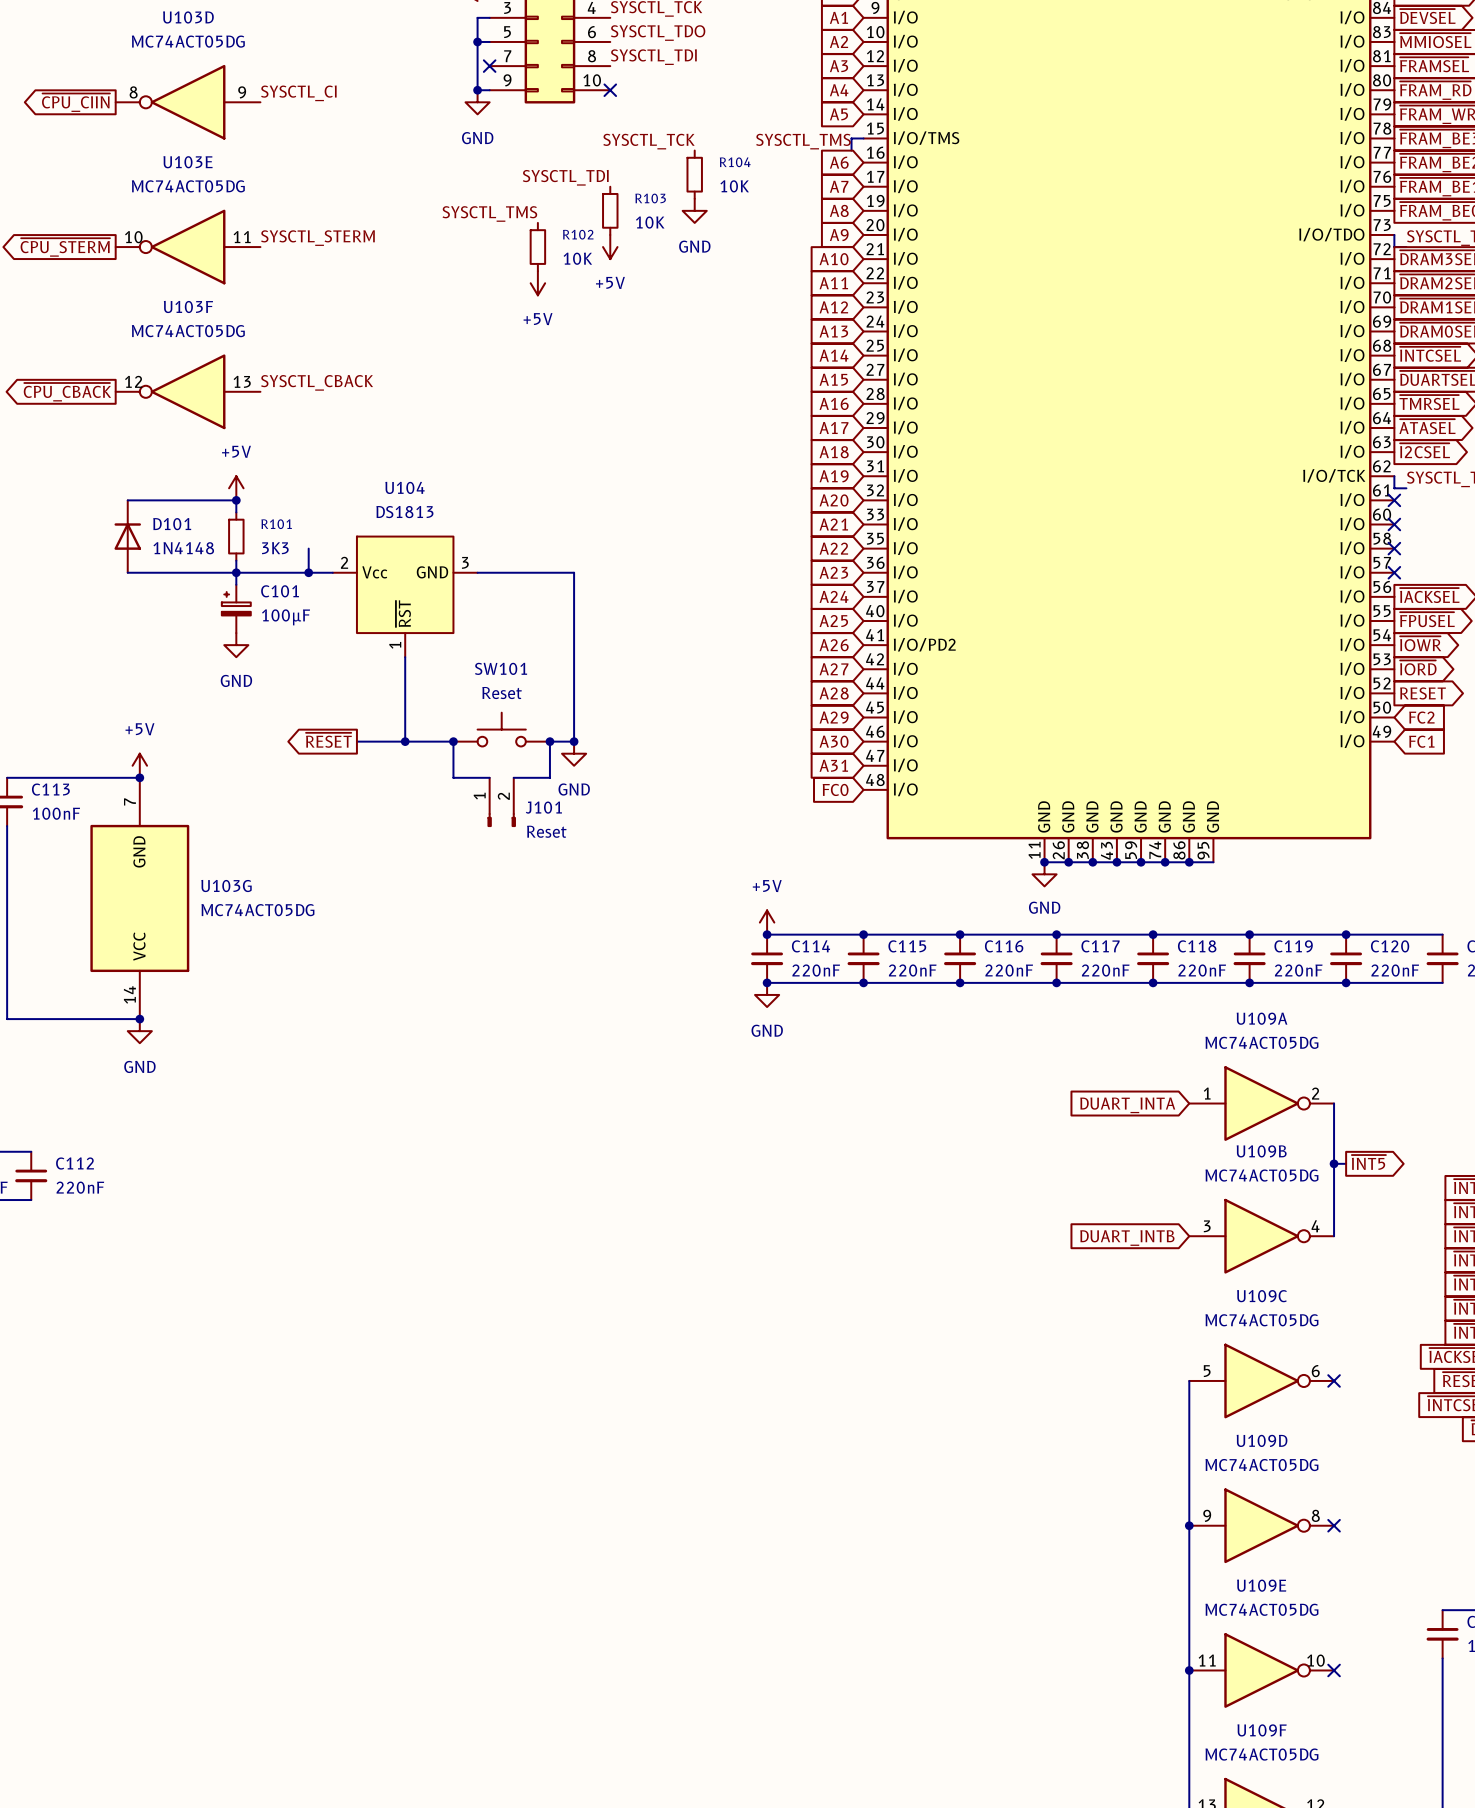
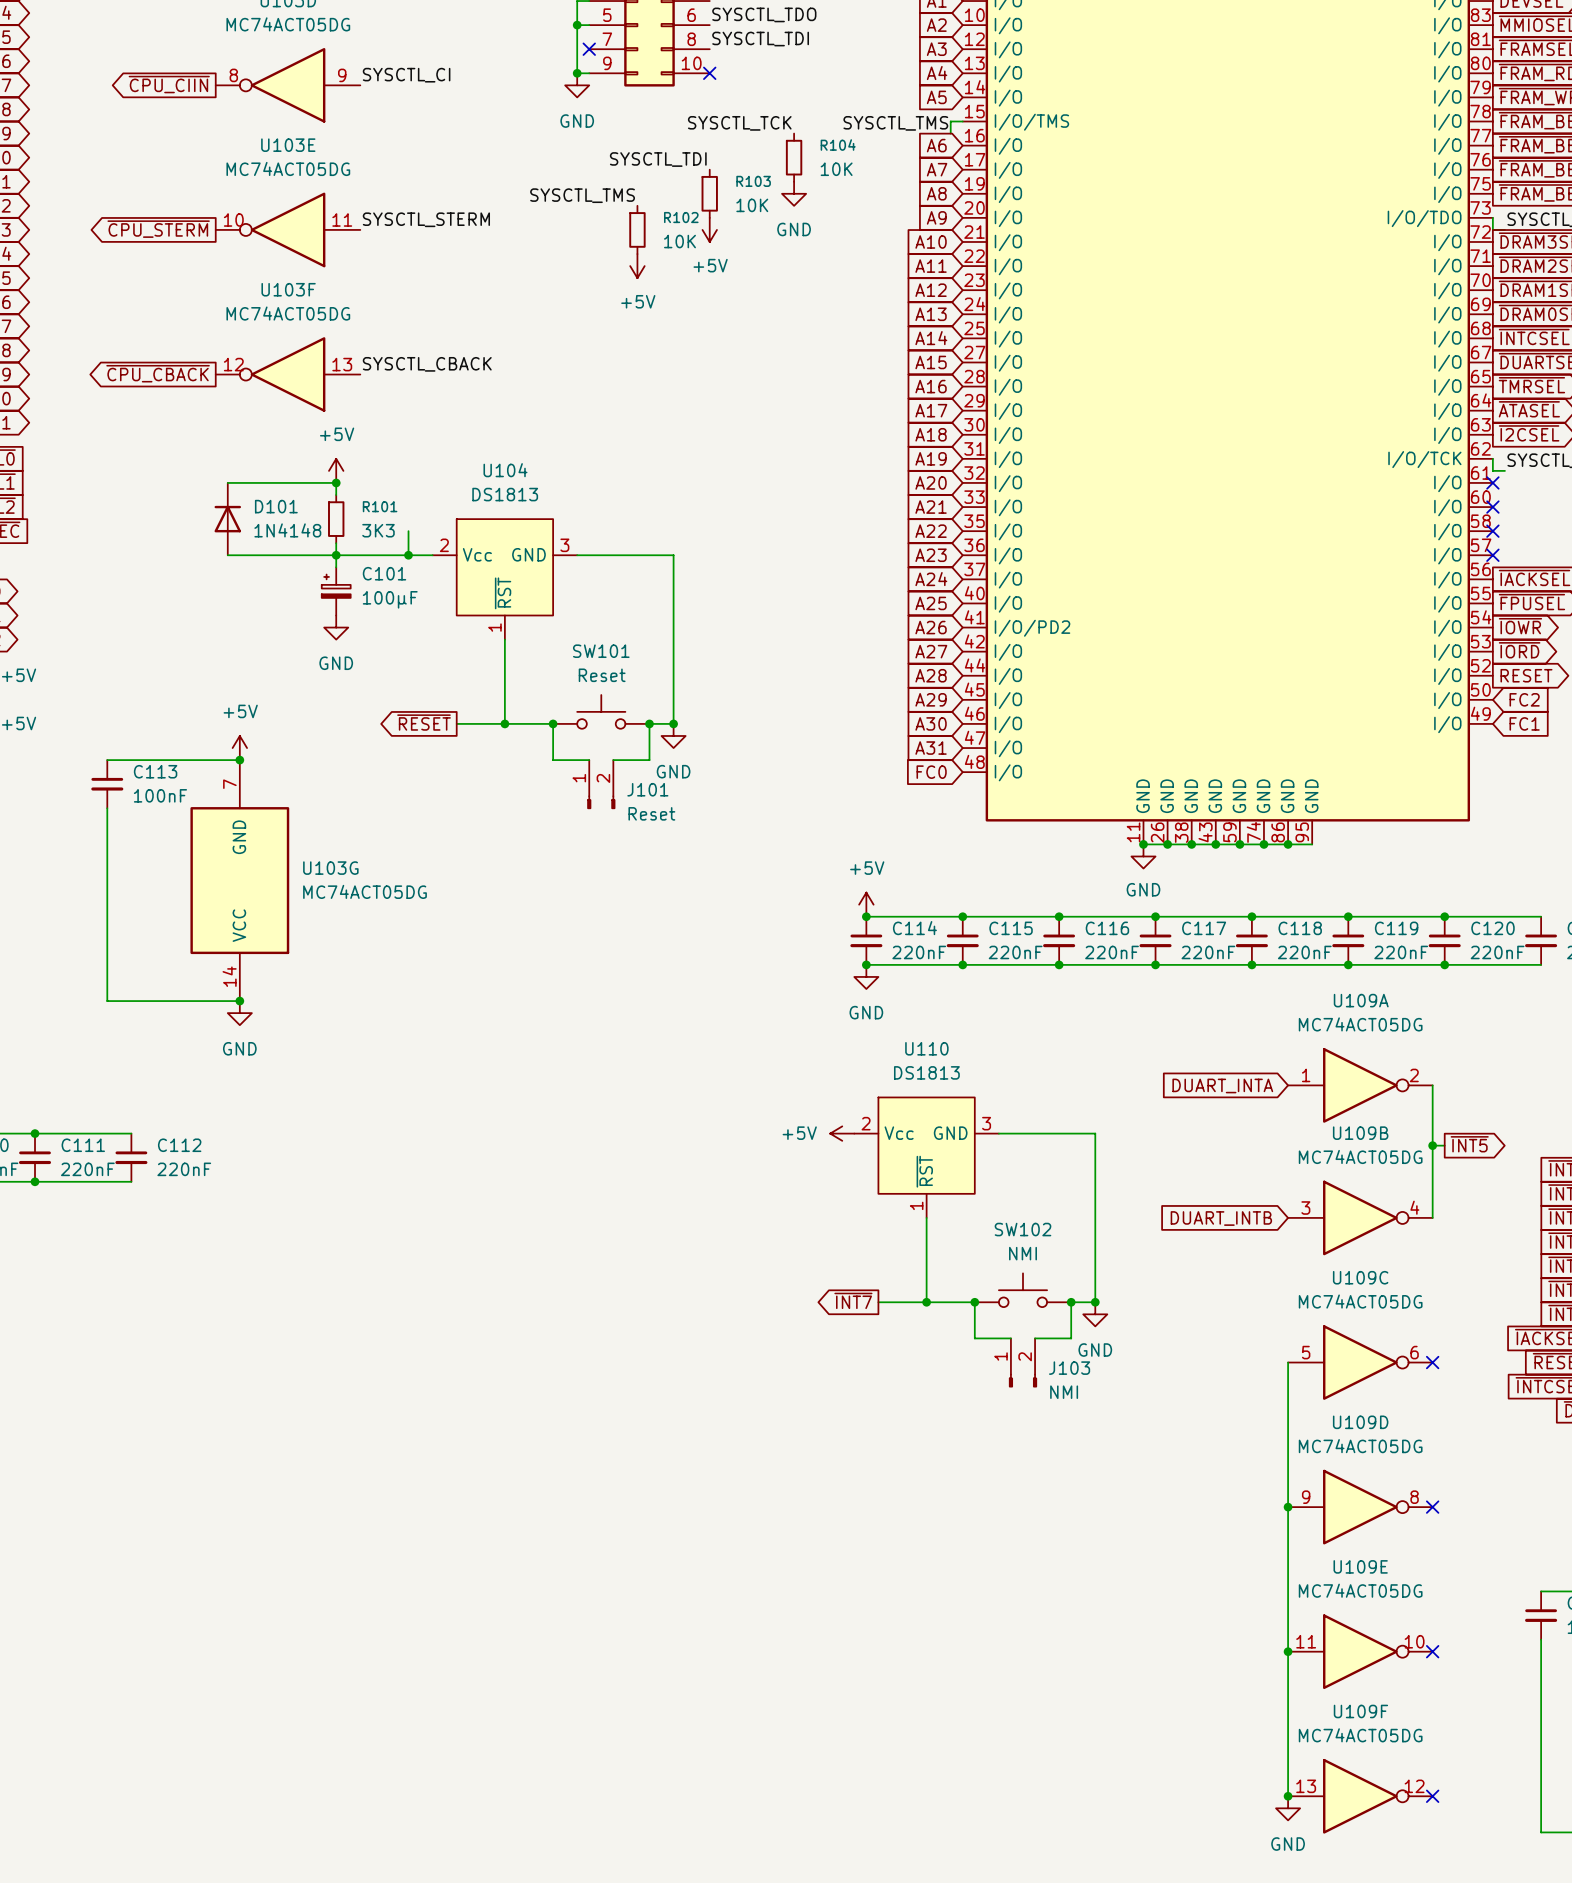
power symbol: none -> +5V (842, 1133)
wire: none -> (998, 1133) (1095, 1133) (1095, 1302) (1071, 1302) (1071, 1338) (1035, 1338)
U110: none -> DS1813 (926, 1157)
wire: none -> (926, 1217) (926, 1302)
SW102: none -> NMI (1023, 1290)
global label: none -> ~{INT7} (853, 1300)
wire: none -> (878, 1302) (974, 1302) (974, 1338) (1010, 1338)
junction: none -> (926, 1302)
junction: none -> (974, 1302)
junction: none -> (1071, 1302)
junction: none -> (1095, 1302)
power symbol: none -> GND (1095, 1314)
J103: none -> NMI (1023, 1362)

